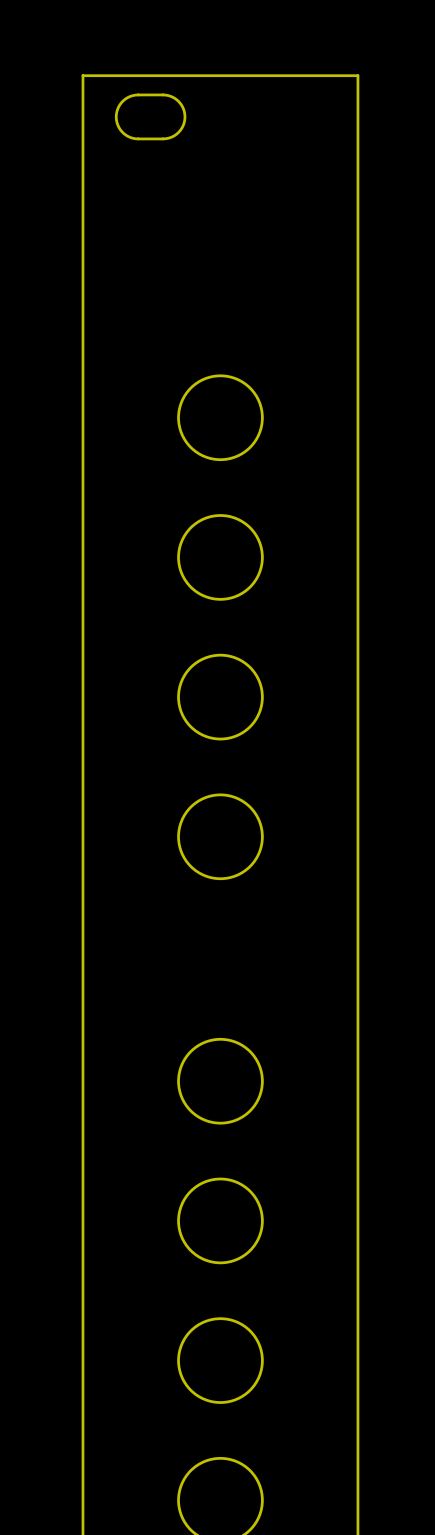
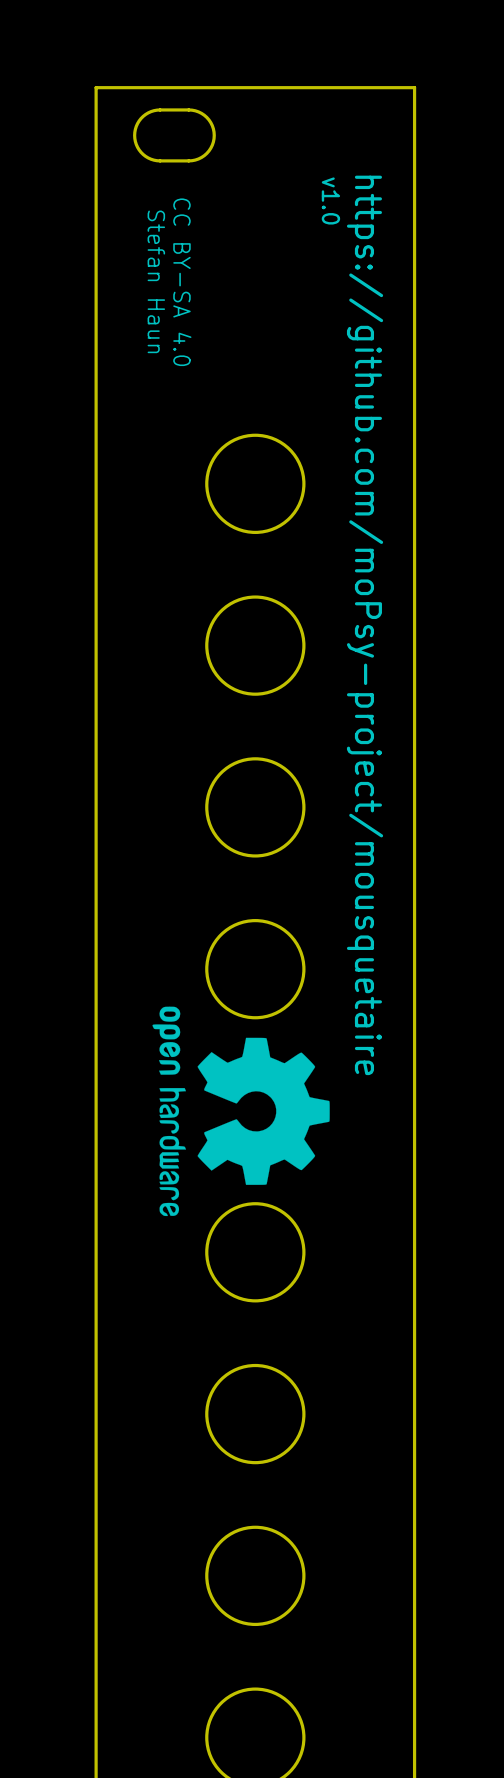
text: none -> v1.0 (330, 200)
text: none -> Stefan Haun (156, 281)
text: none -> CC BY-SA 4.0 (182, 282)
text: none -> https://github.com/moPsy-project/mousquetaire (365, 625)
drawing: none -> [152, 1006, 330, 1217]

